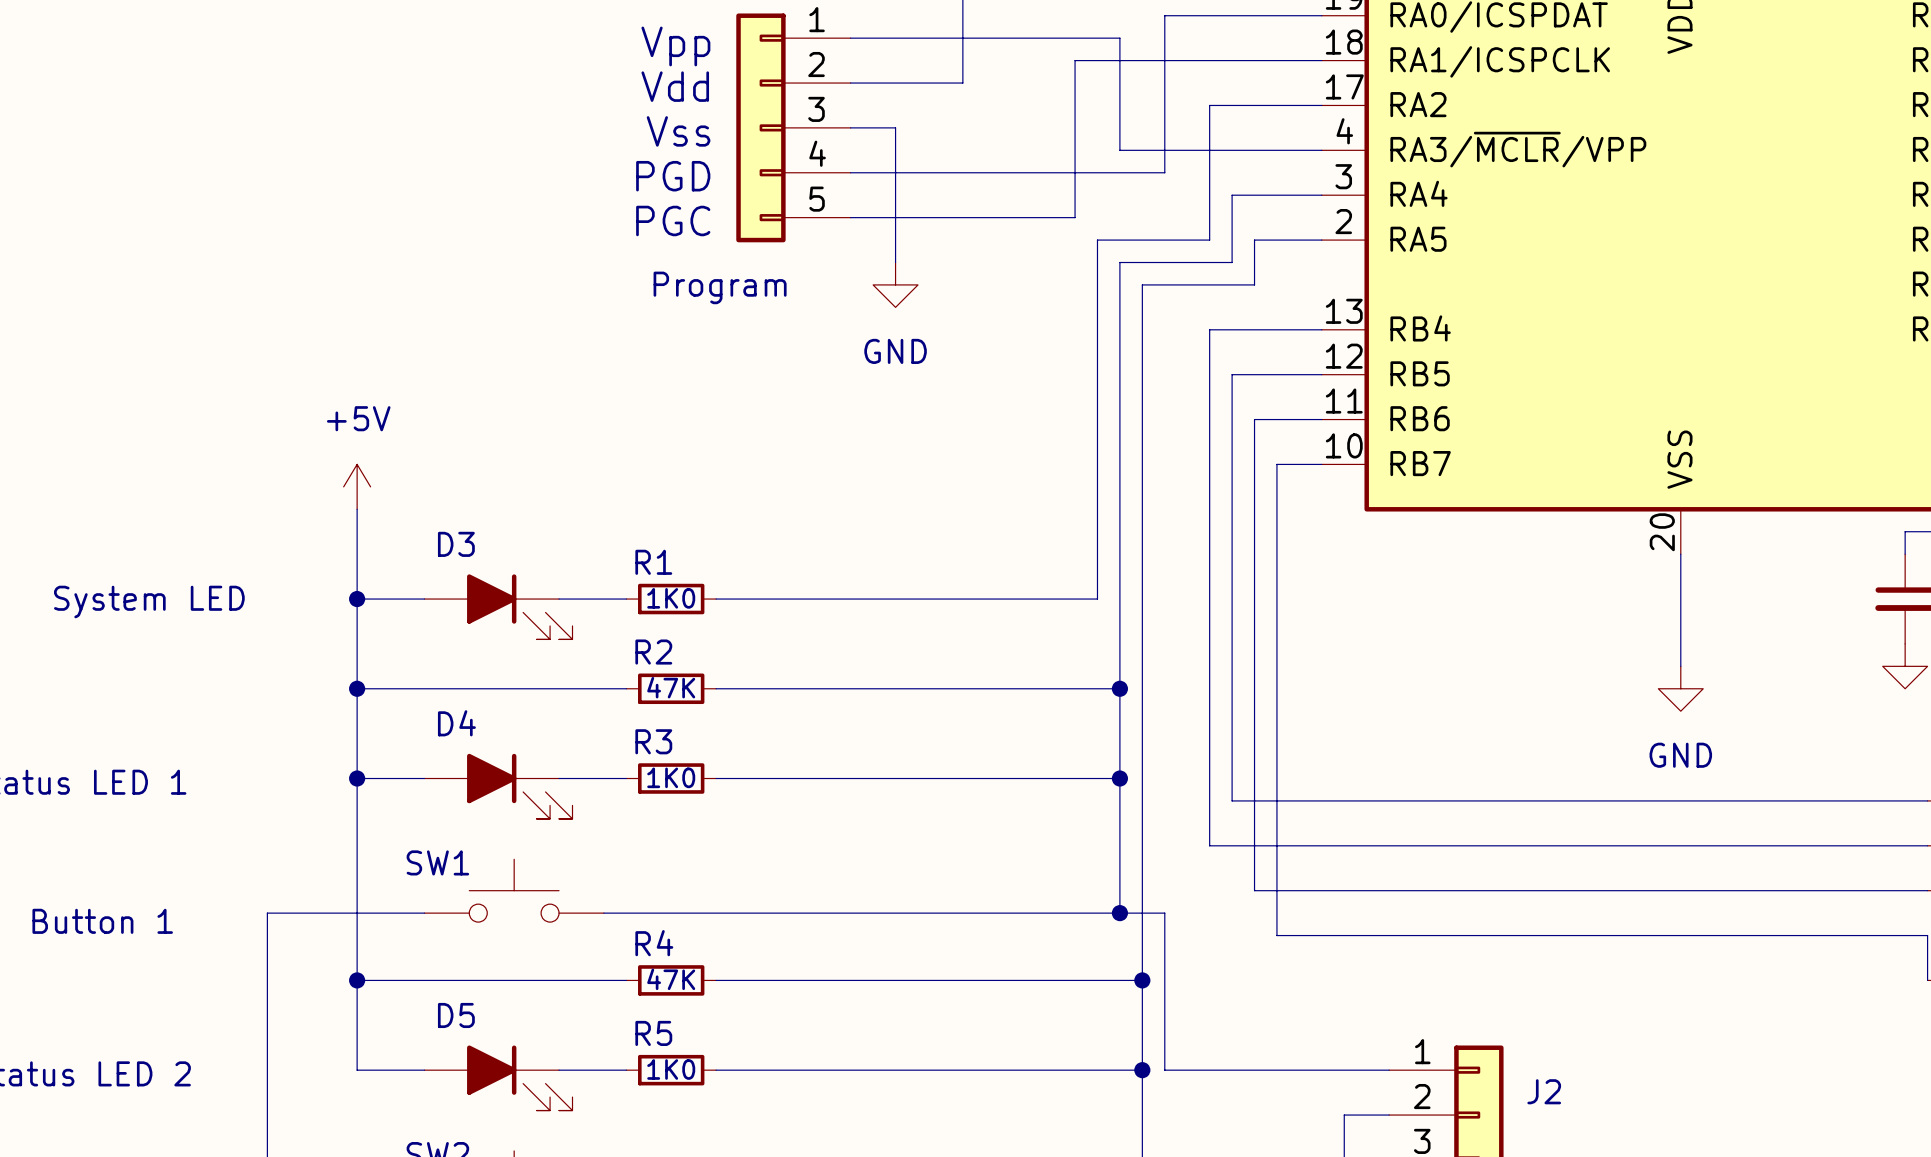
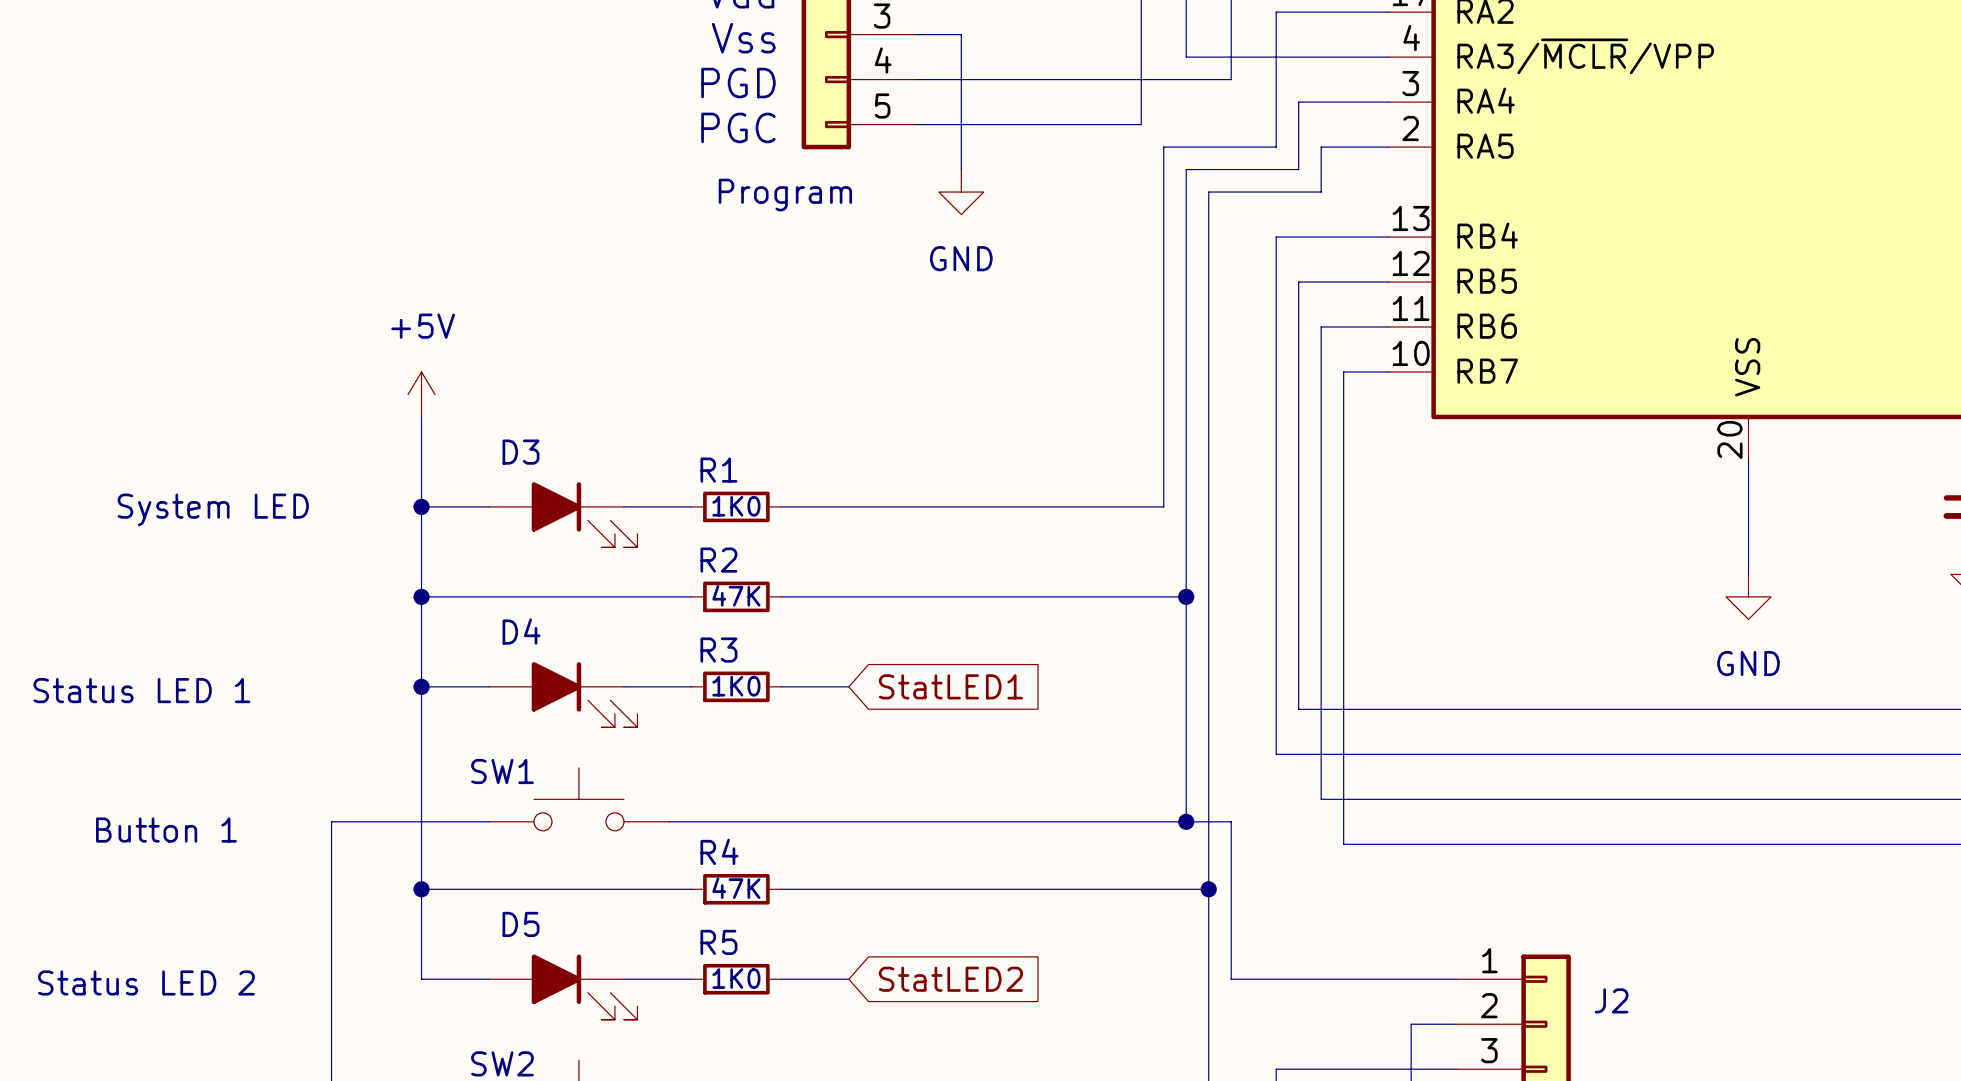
wire: (783, 778) (1119, 778) -> none
global label: none -> StatLED1 (950, 686)
junction: (1119, 778) -> none
wire: (783, 1070) (1142, 1070) -> none
global label: none -> StatLED2 (950, 979)
junction: (1142, 1070) -> none

